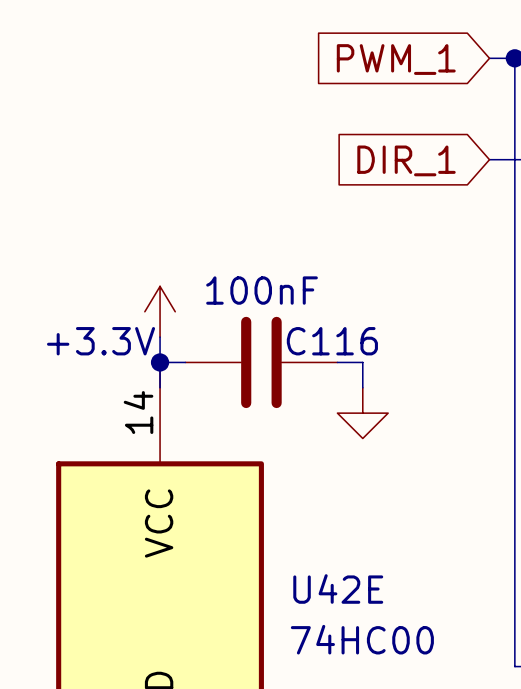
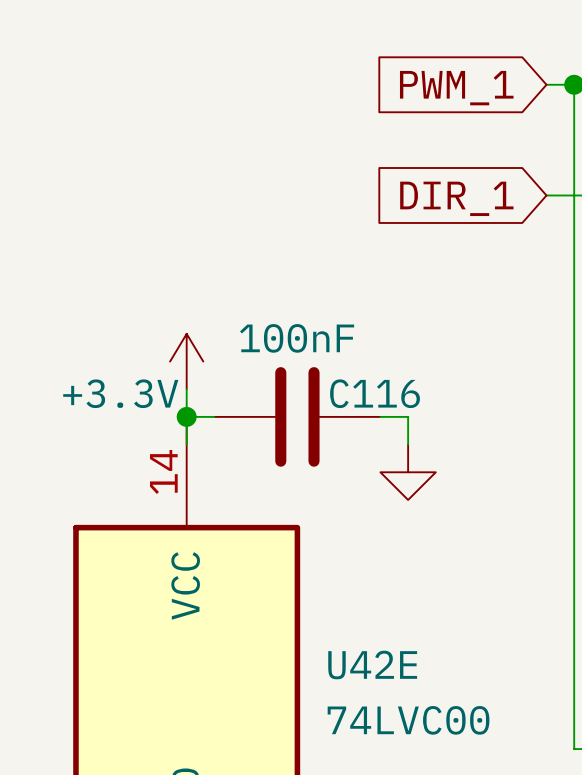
U42E value: 74HC00 (362, 639) -> 74LVC00 (408, 720)

